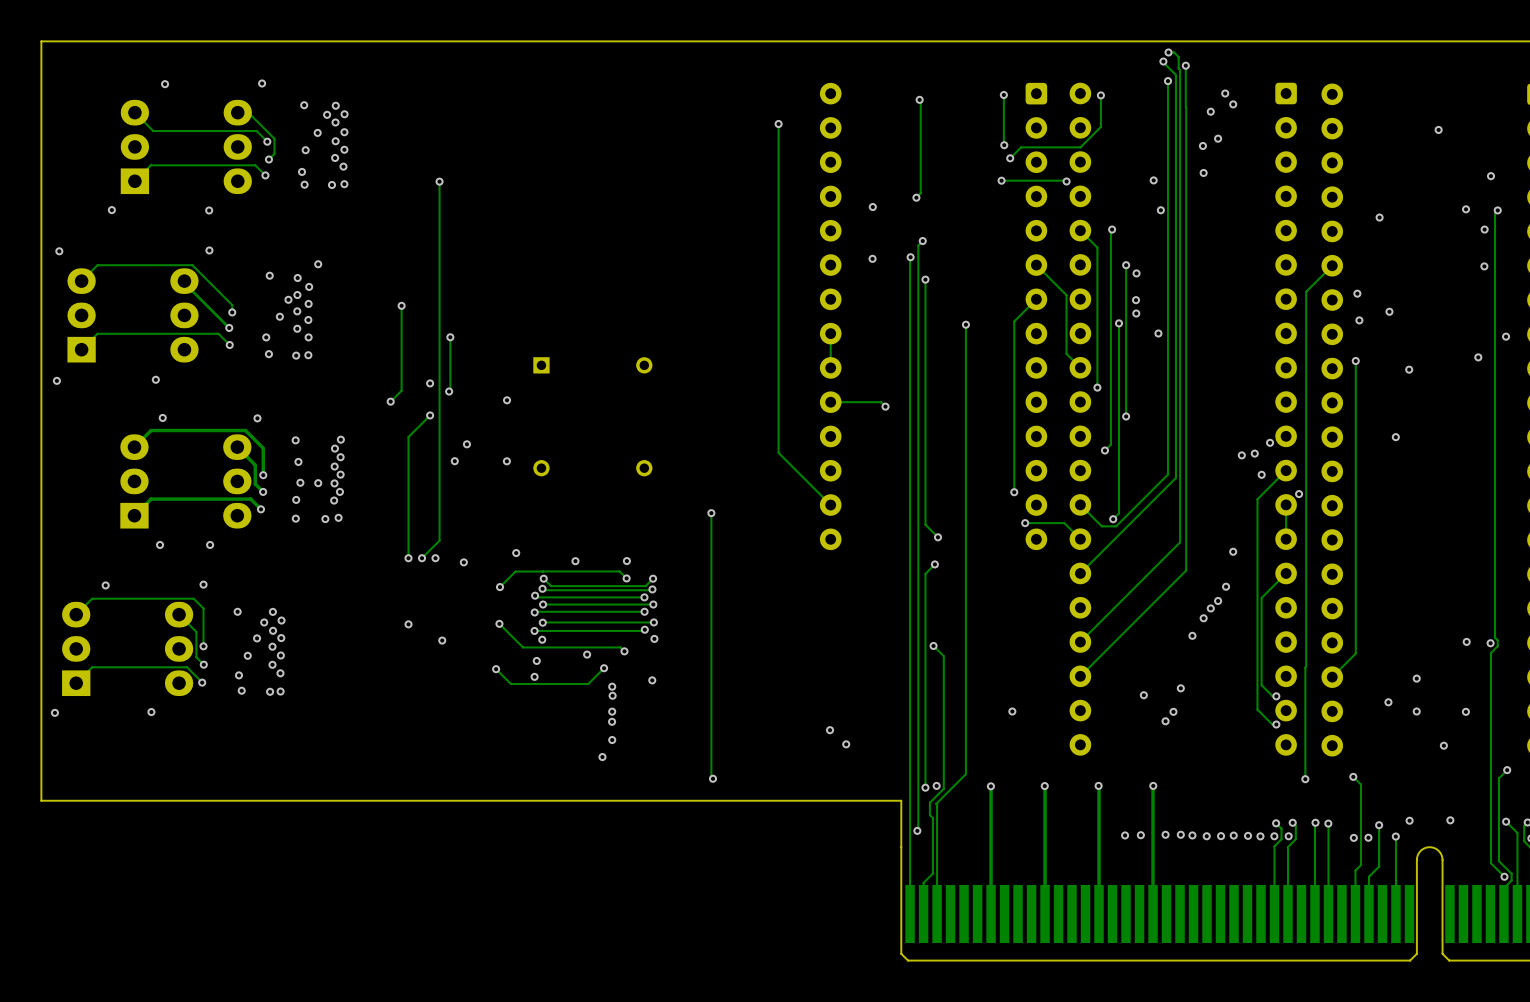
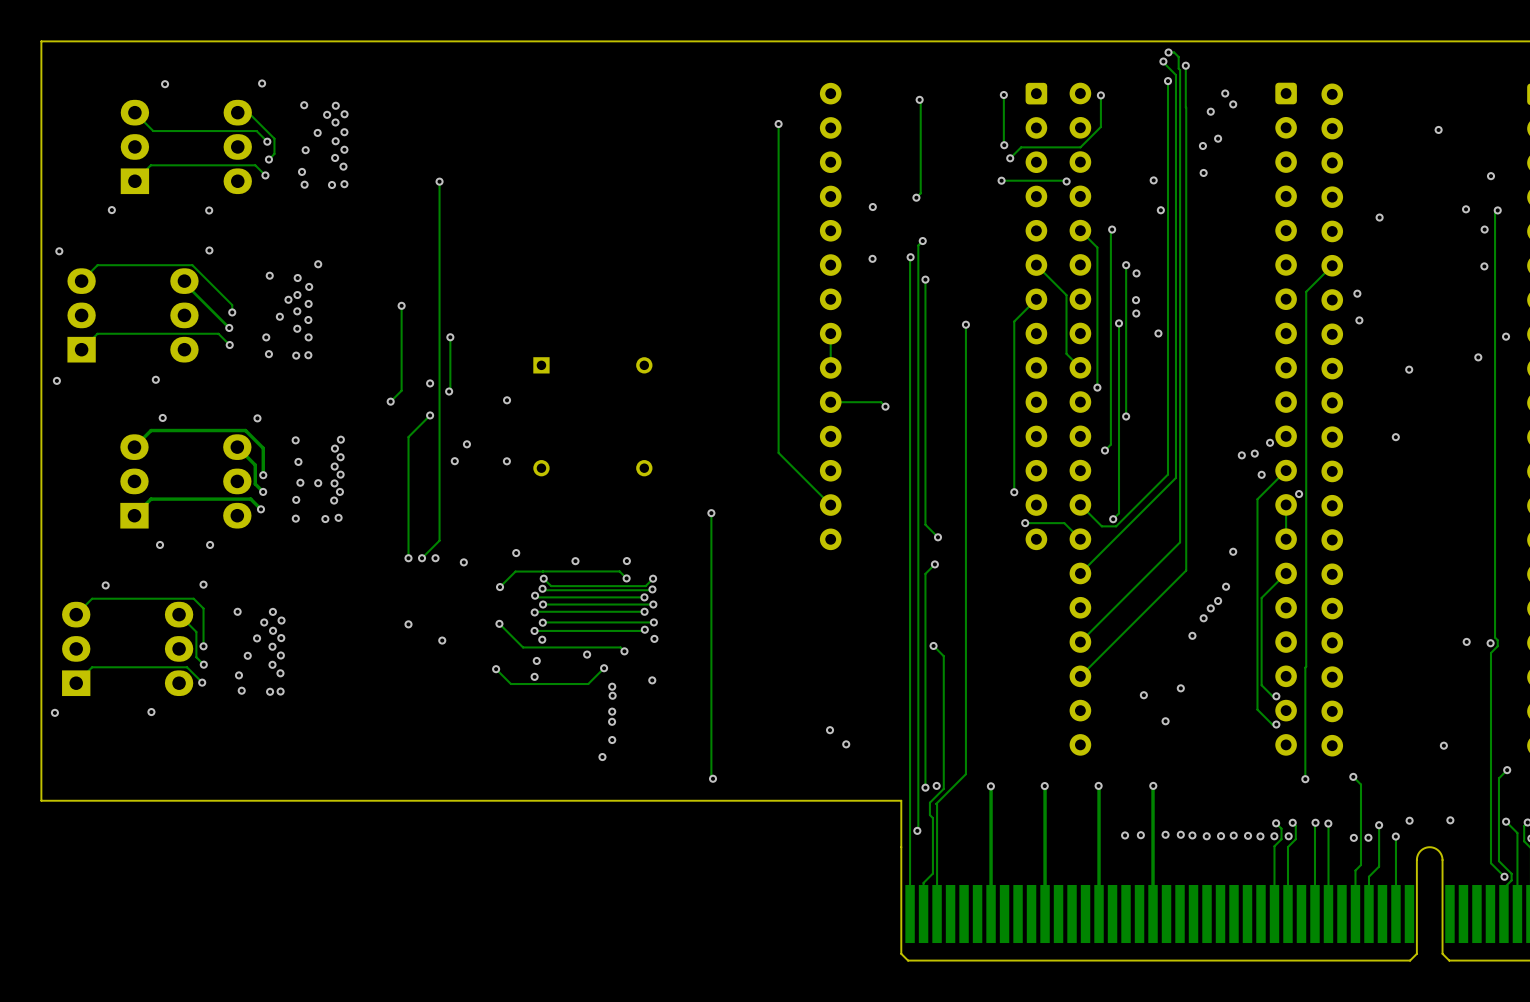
via: (1389, 311) -> none
track: (1355, 361) (1355, 653) (1332, 677) -> none
via: (1355, 361) -> none
via: (1416, 678) -> none
via: (1388, 702) -> none
via: (1012, 711) -> none
via: (1173, 711) -> none
via: (1416, 711) -> none
via: (1465, 711) -> none

